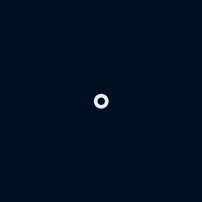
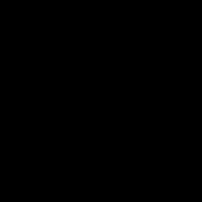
via: (101, 101) -> none

